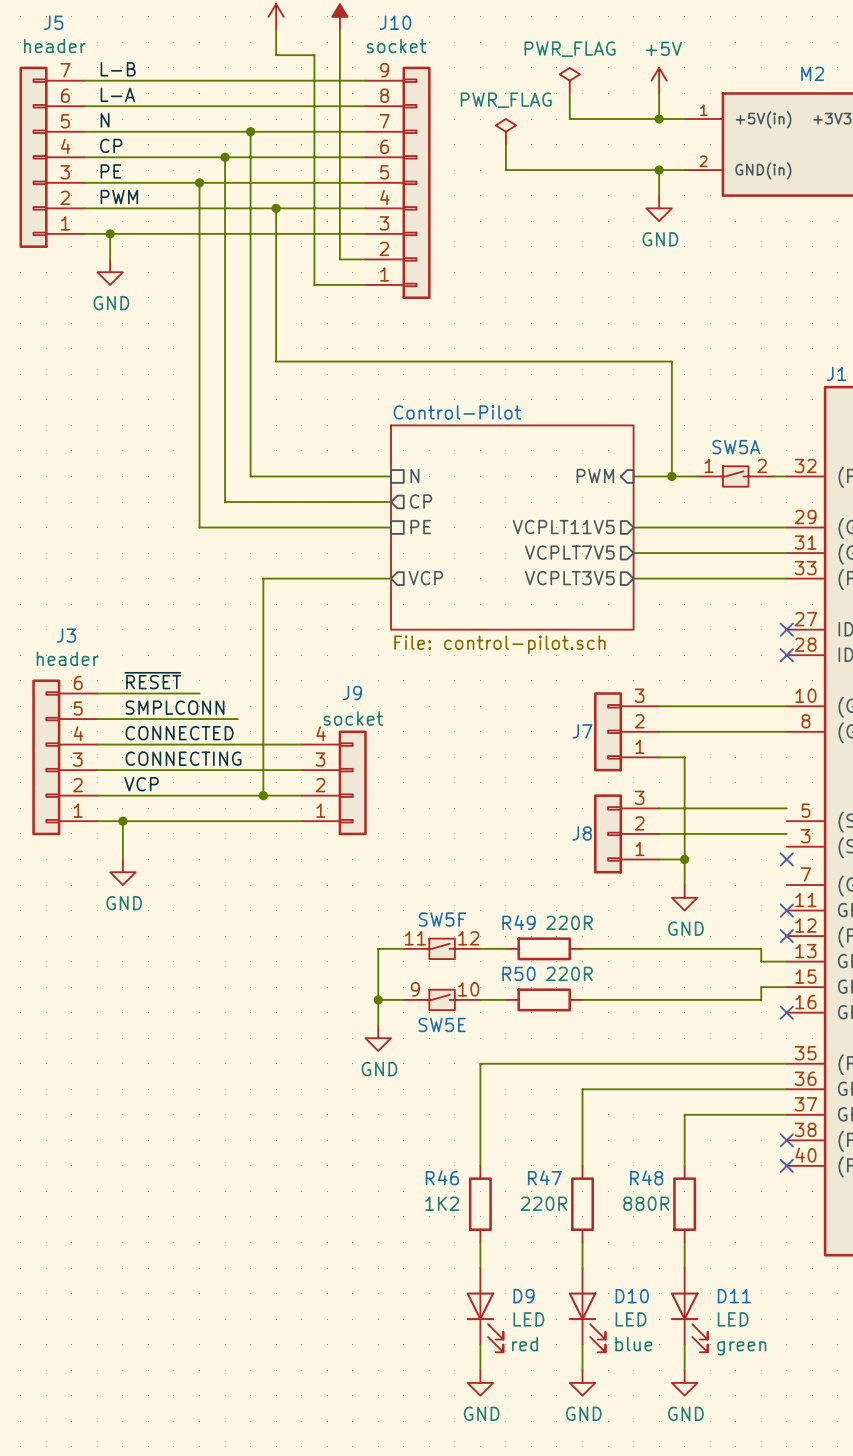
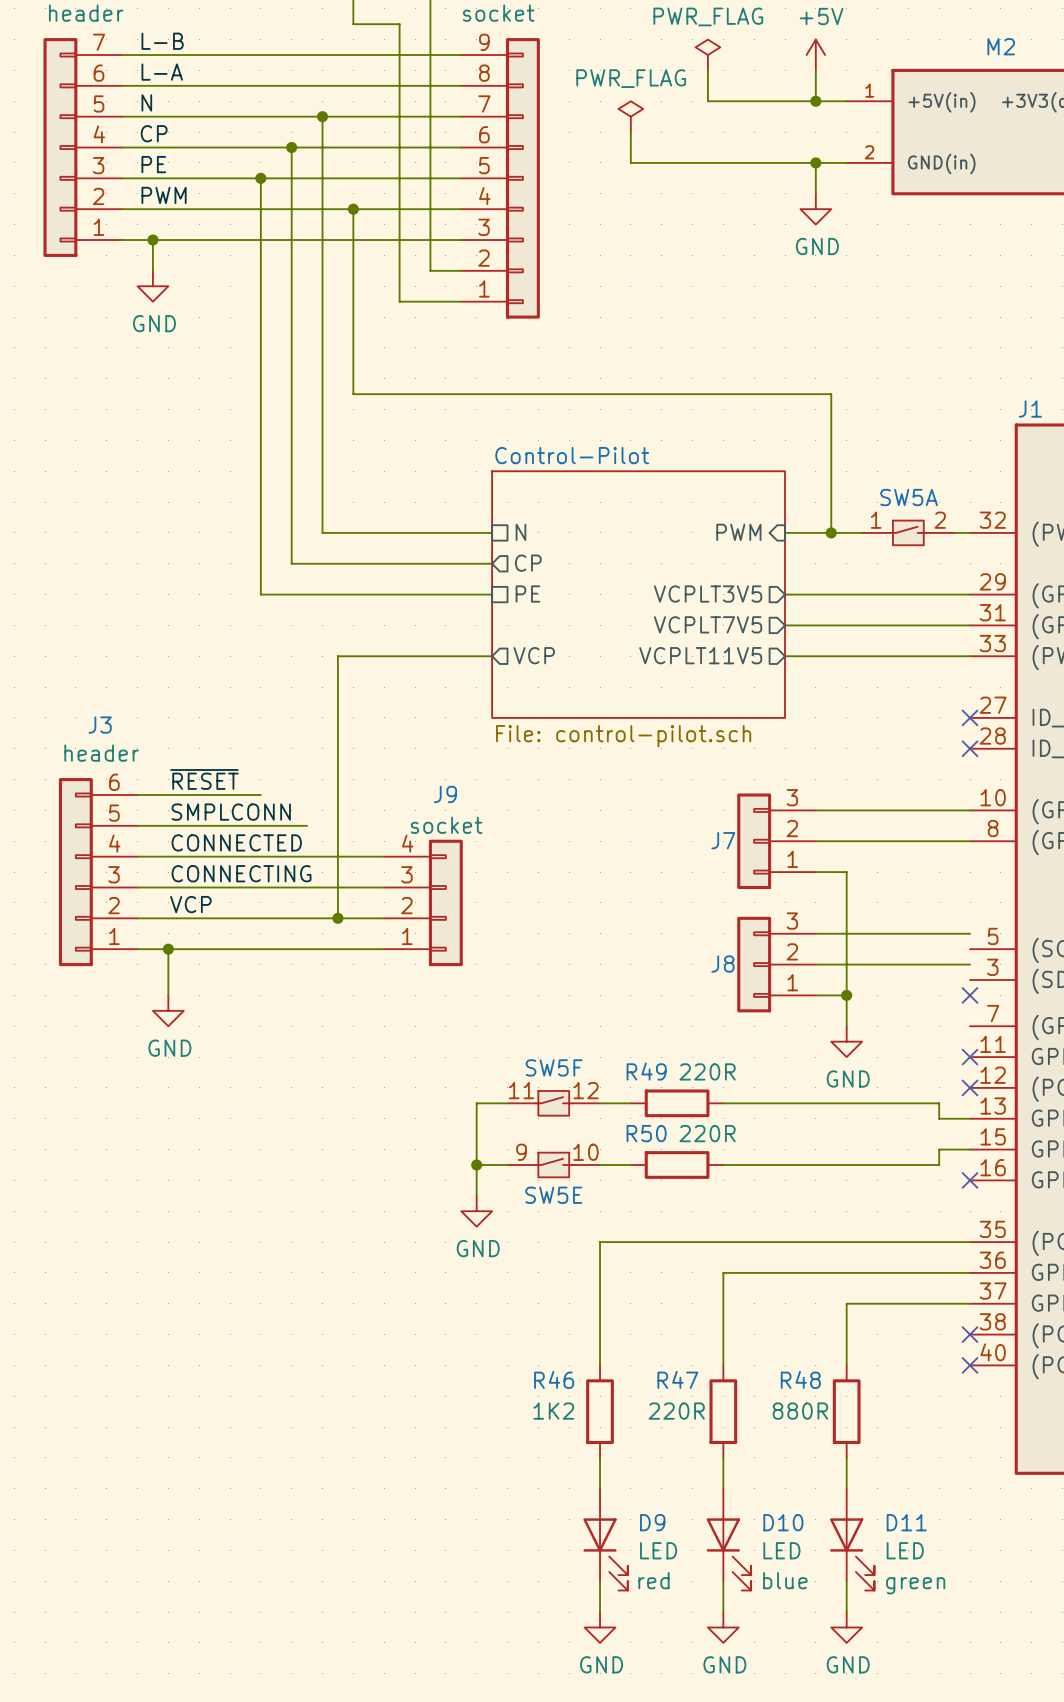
sheet pin: VCPLT11V5 (563, 527) -> VCPLT3V5 (708, 594)
sheet pin: VCPLT3V5 (569, 578) -> VCPLT11V5 (700, 655)

